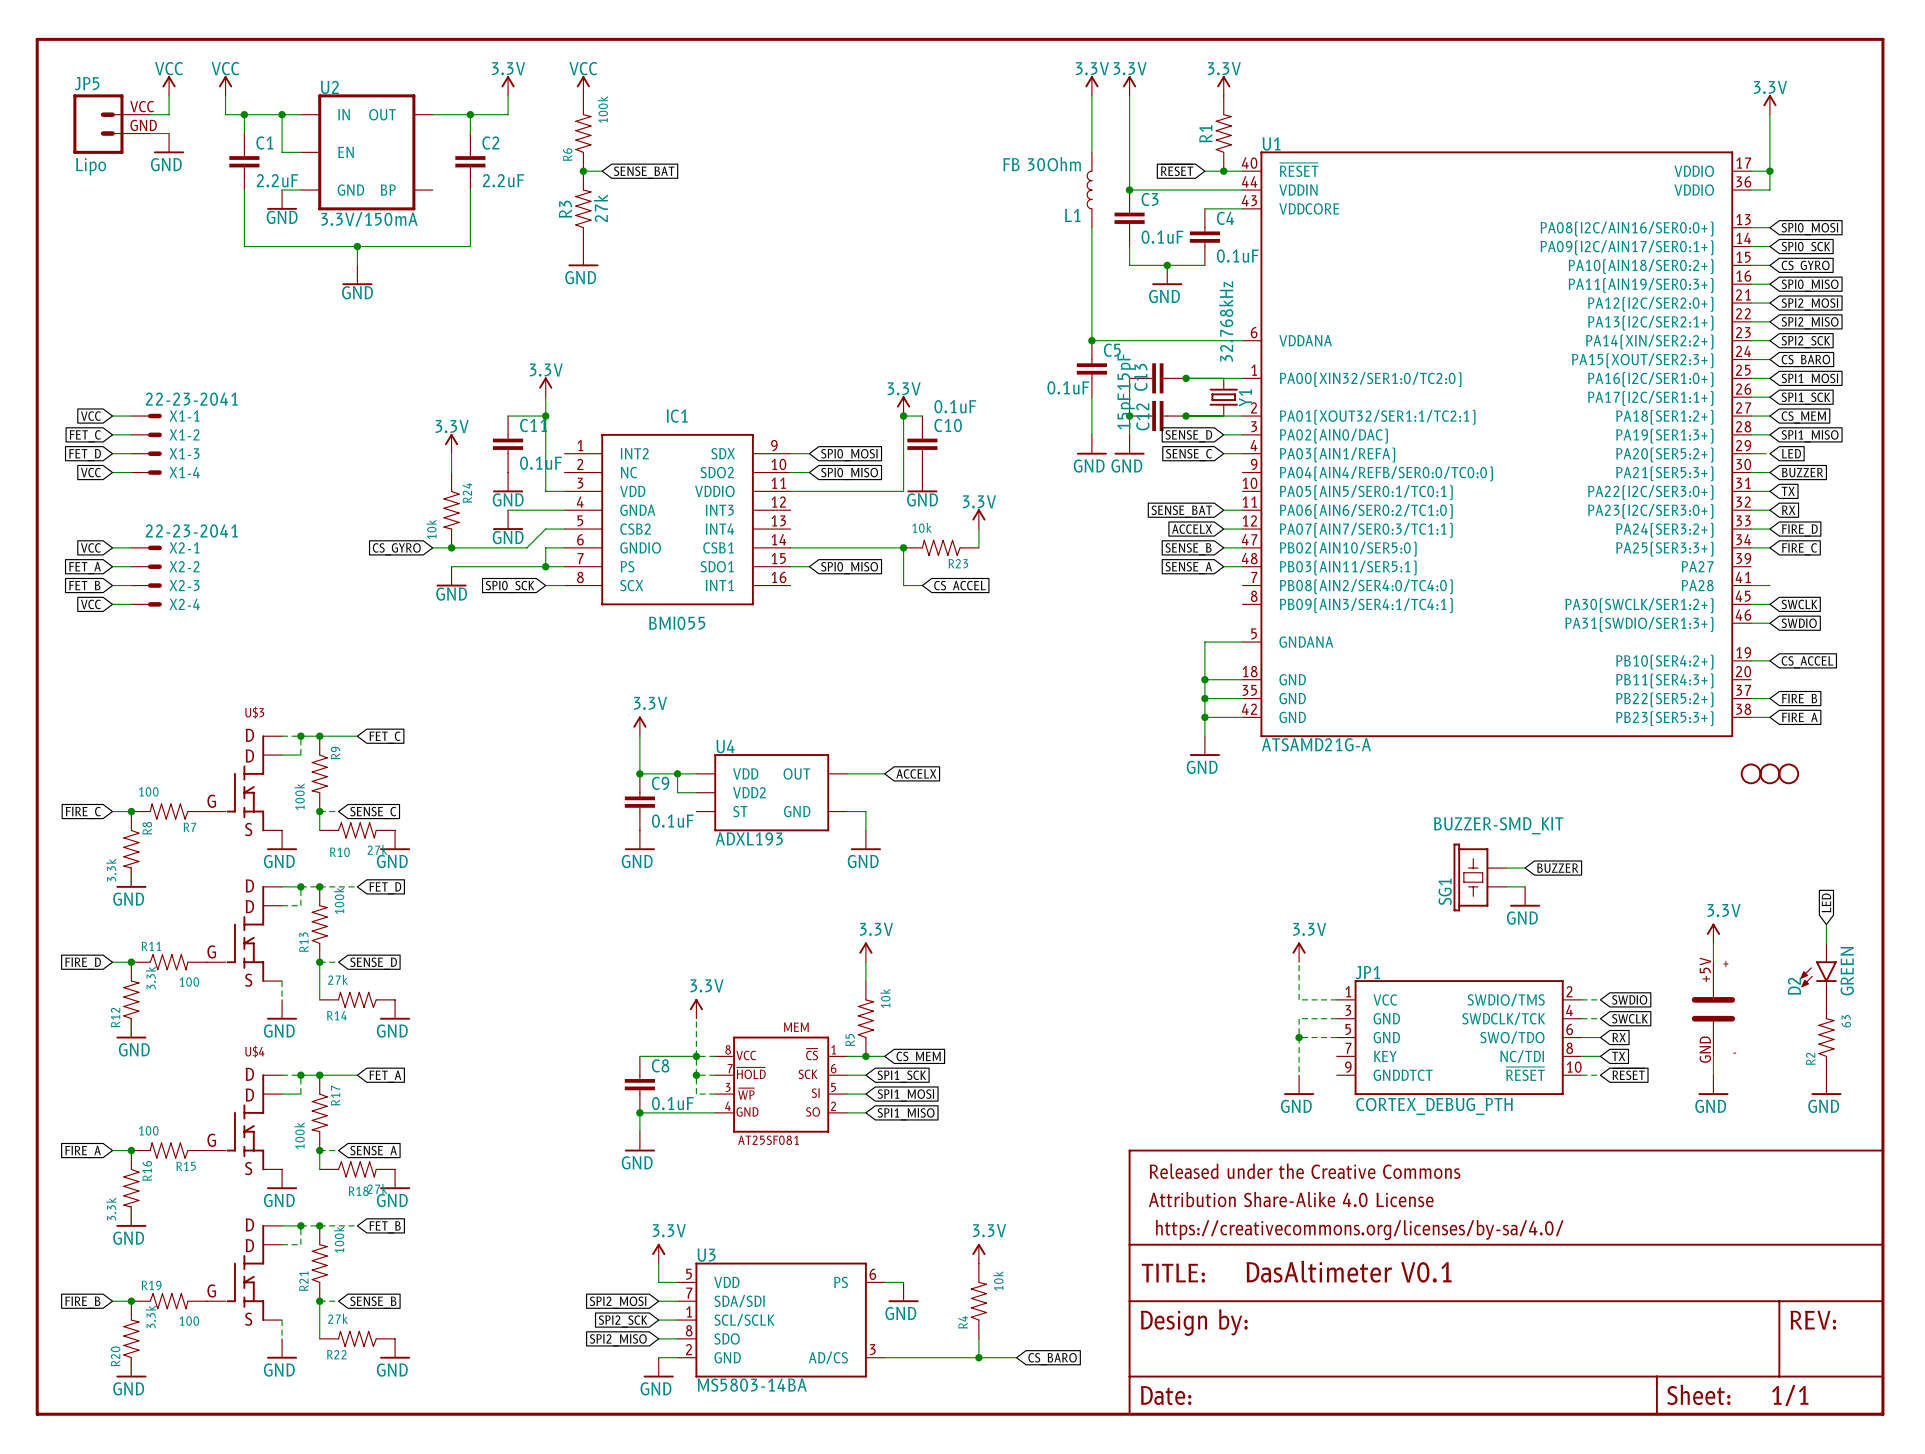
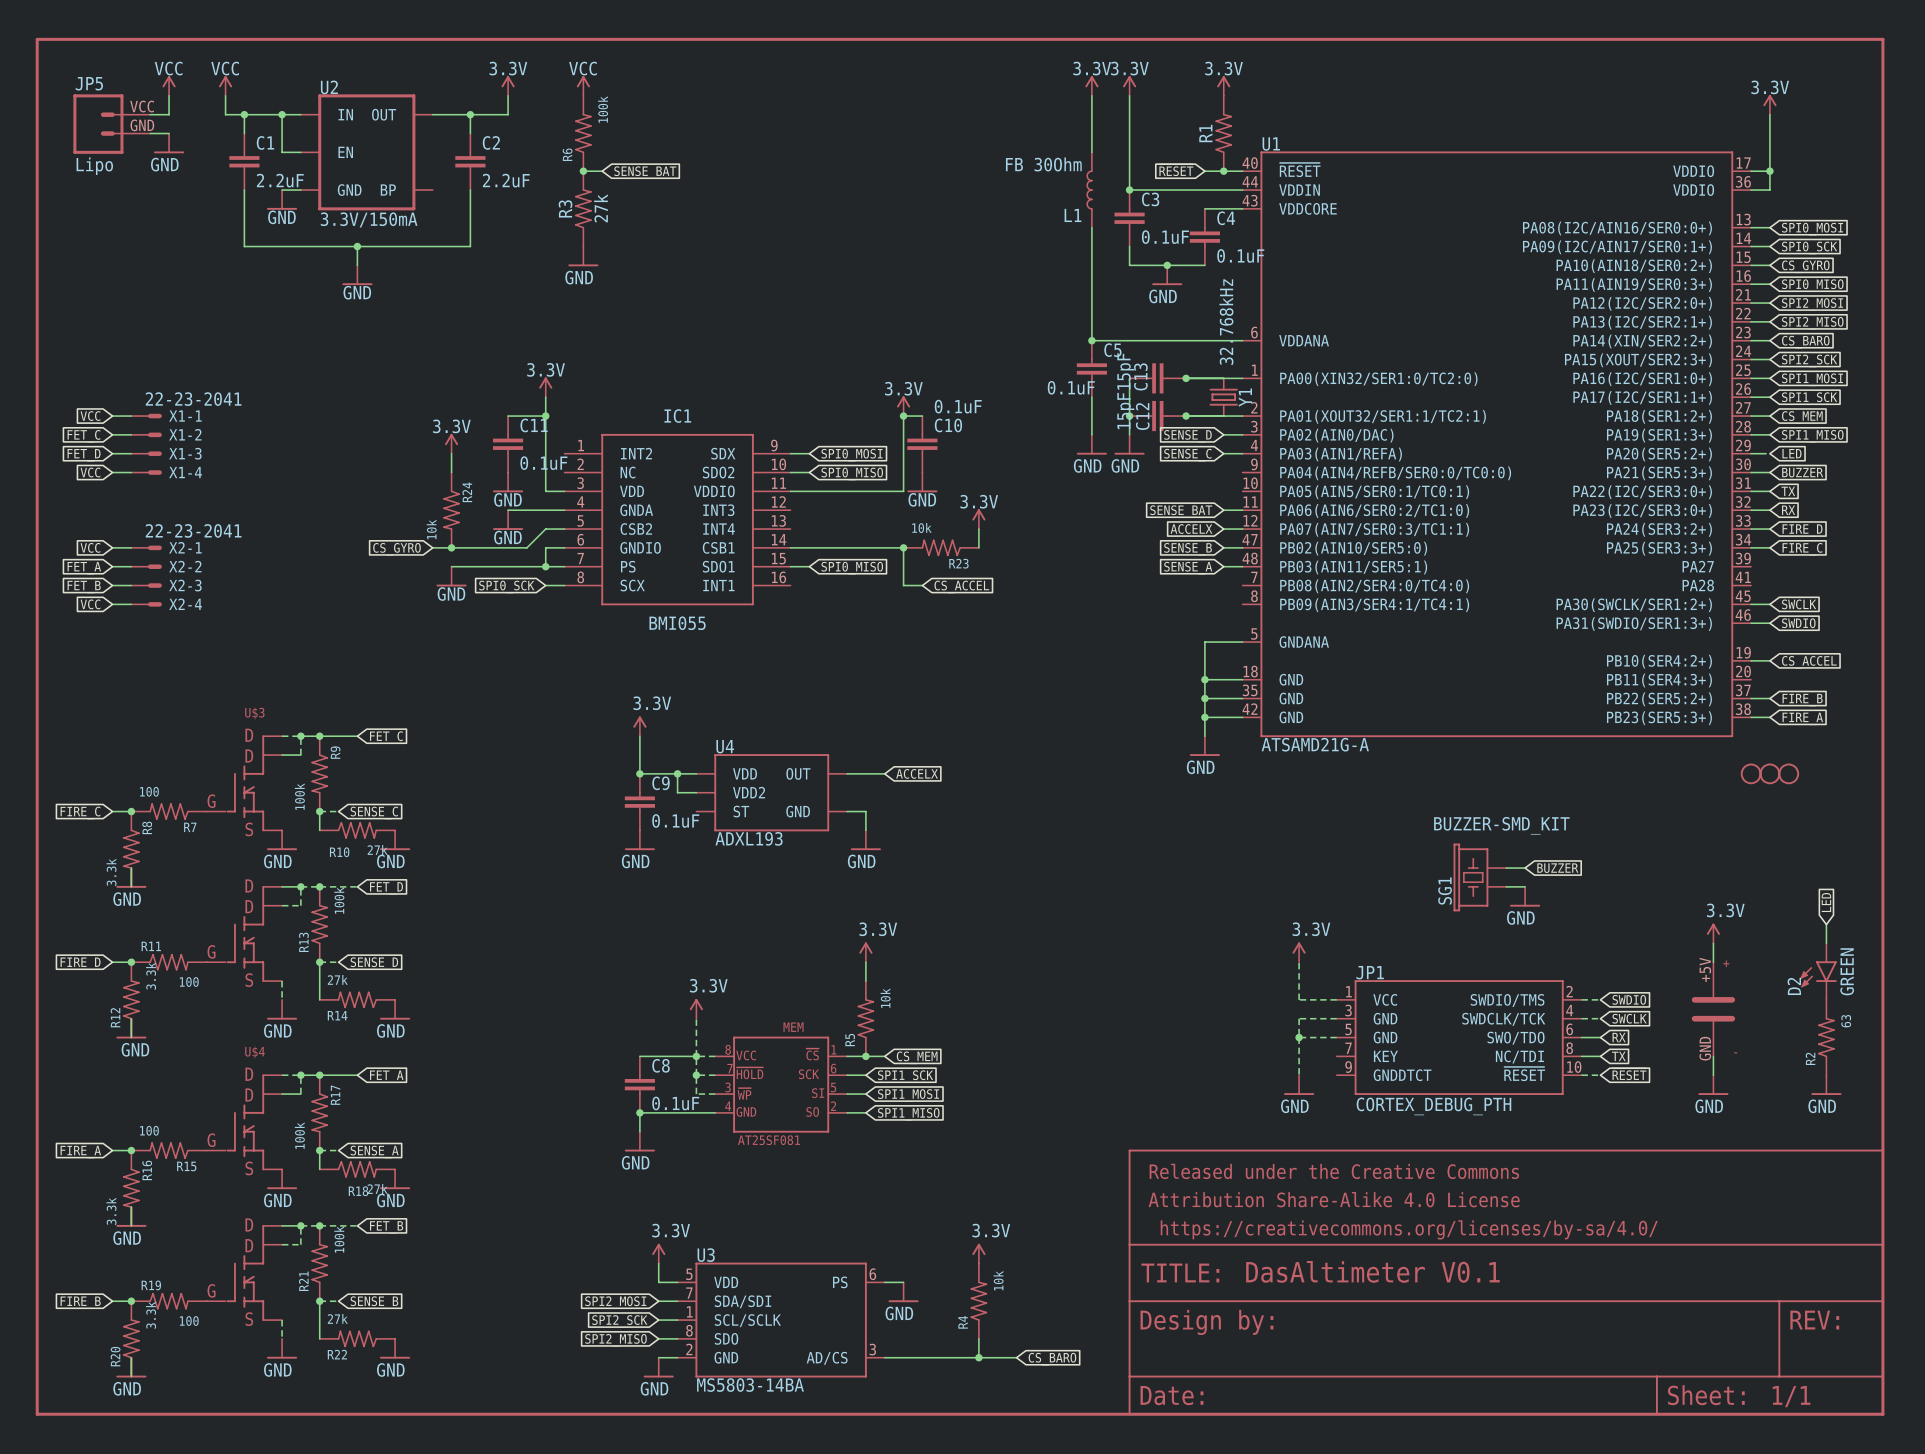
global label: SPI2_SCK (1805, 342) -> CS_BARO (1805, 342)
global label: CS_BARO (1805, 360) -> SPI2_SCK (1809, 360)
wire: (1751, 585) (1769, 585) -> none

